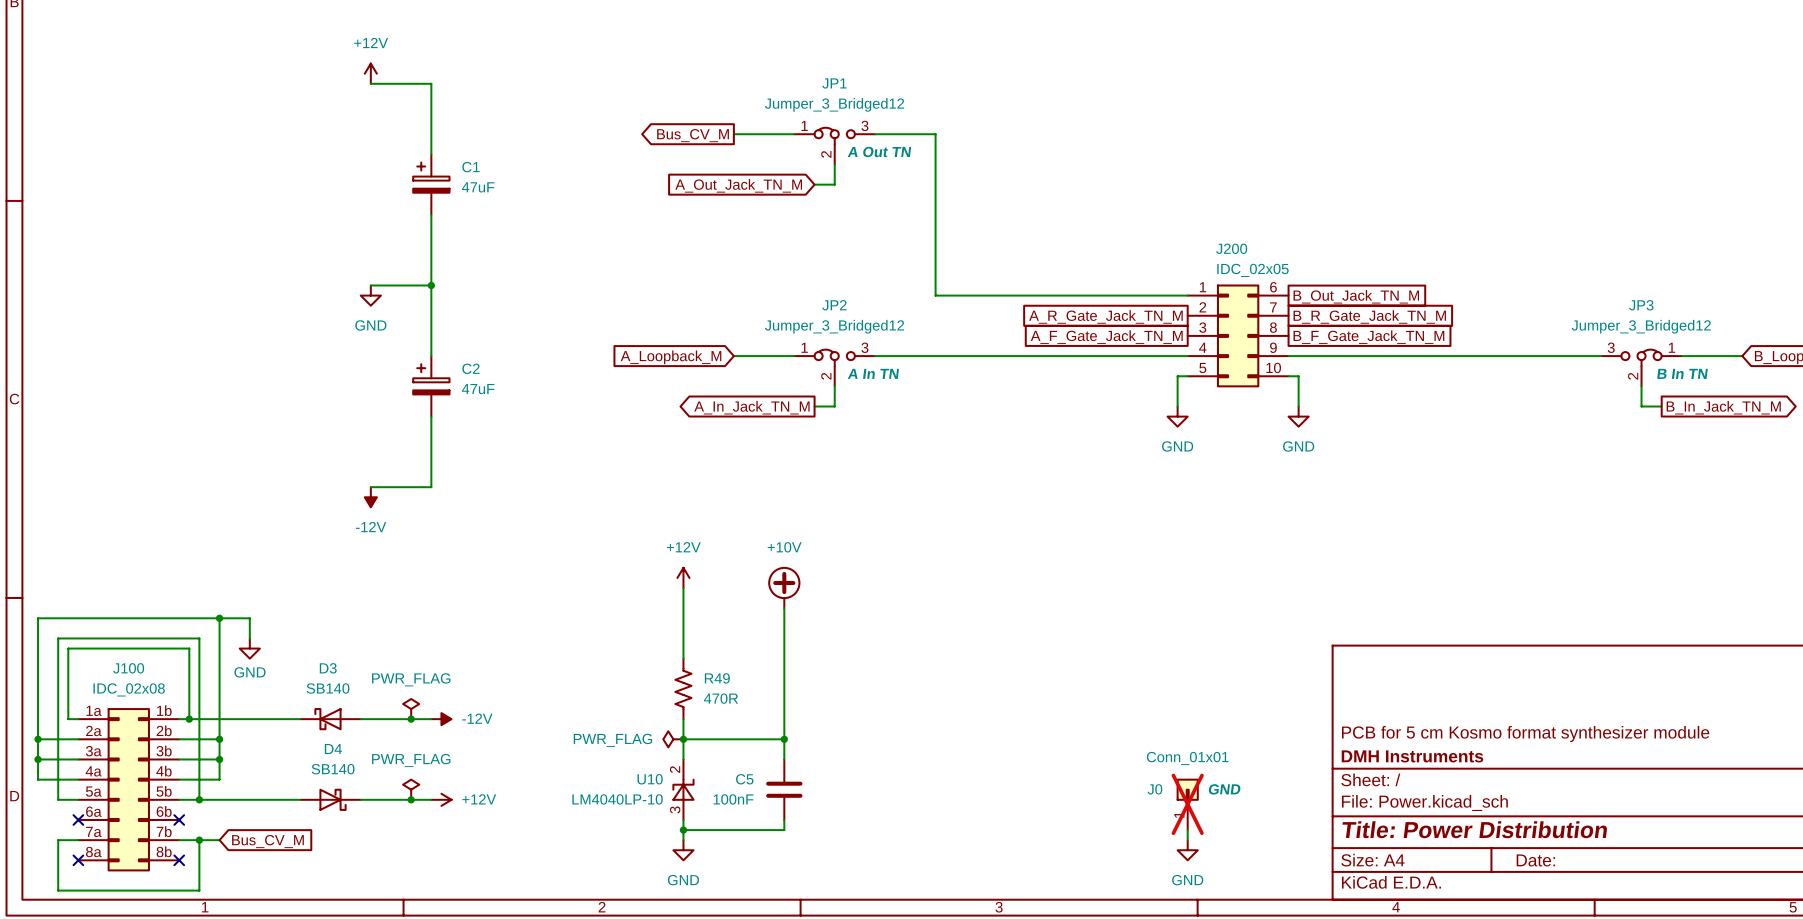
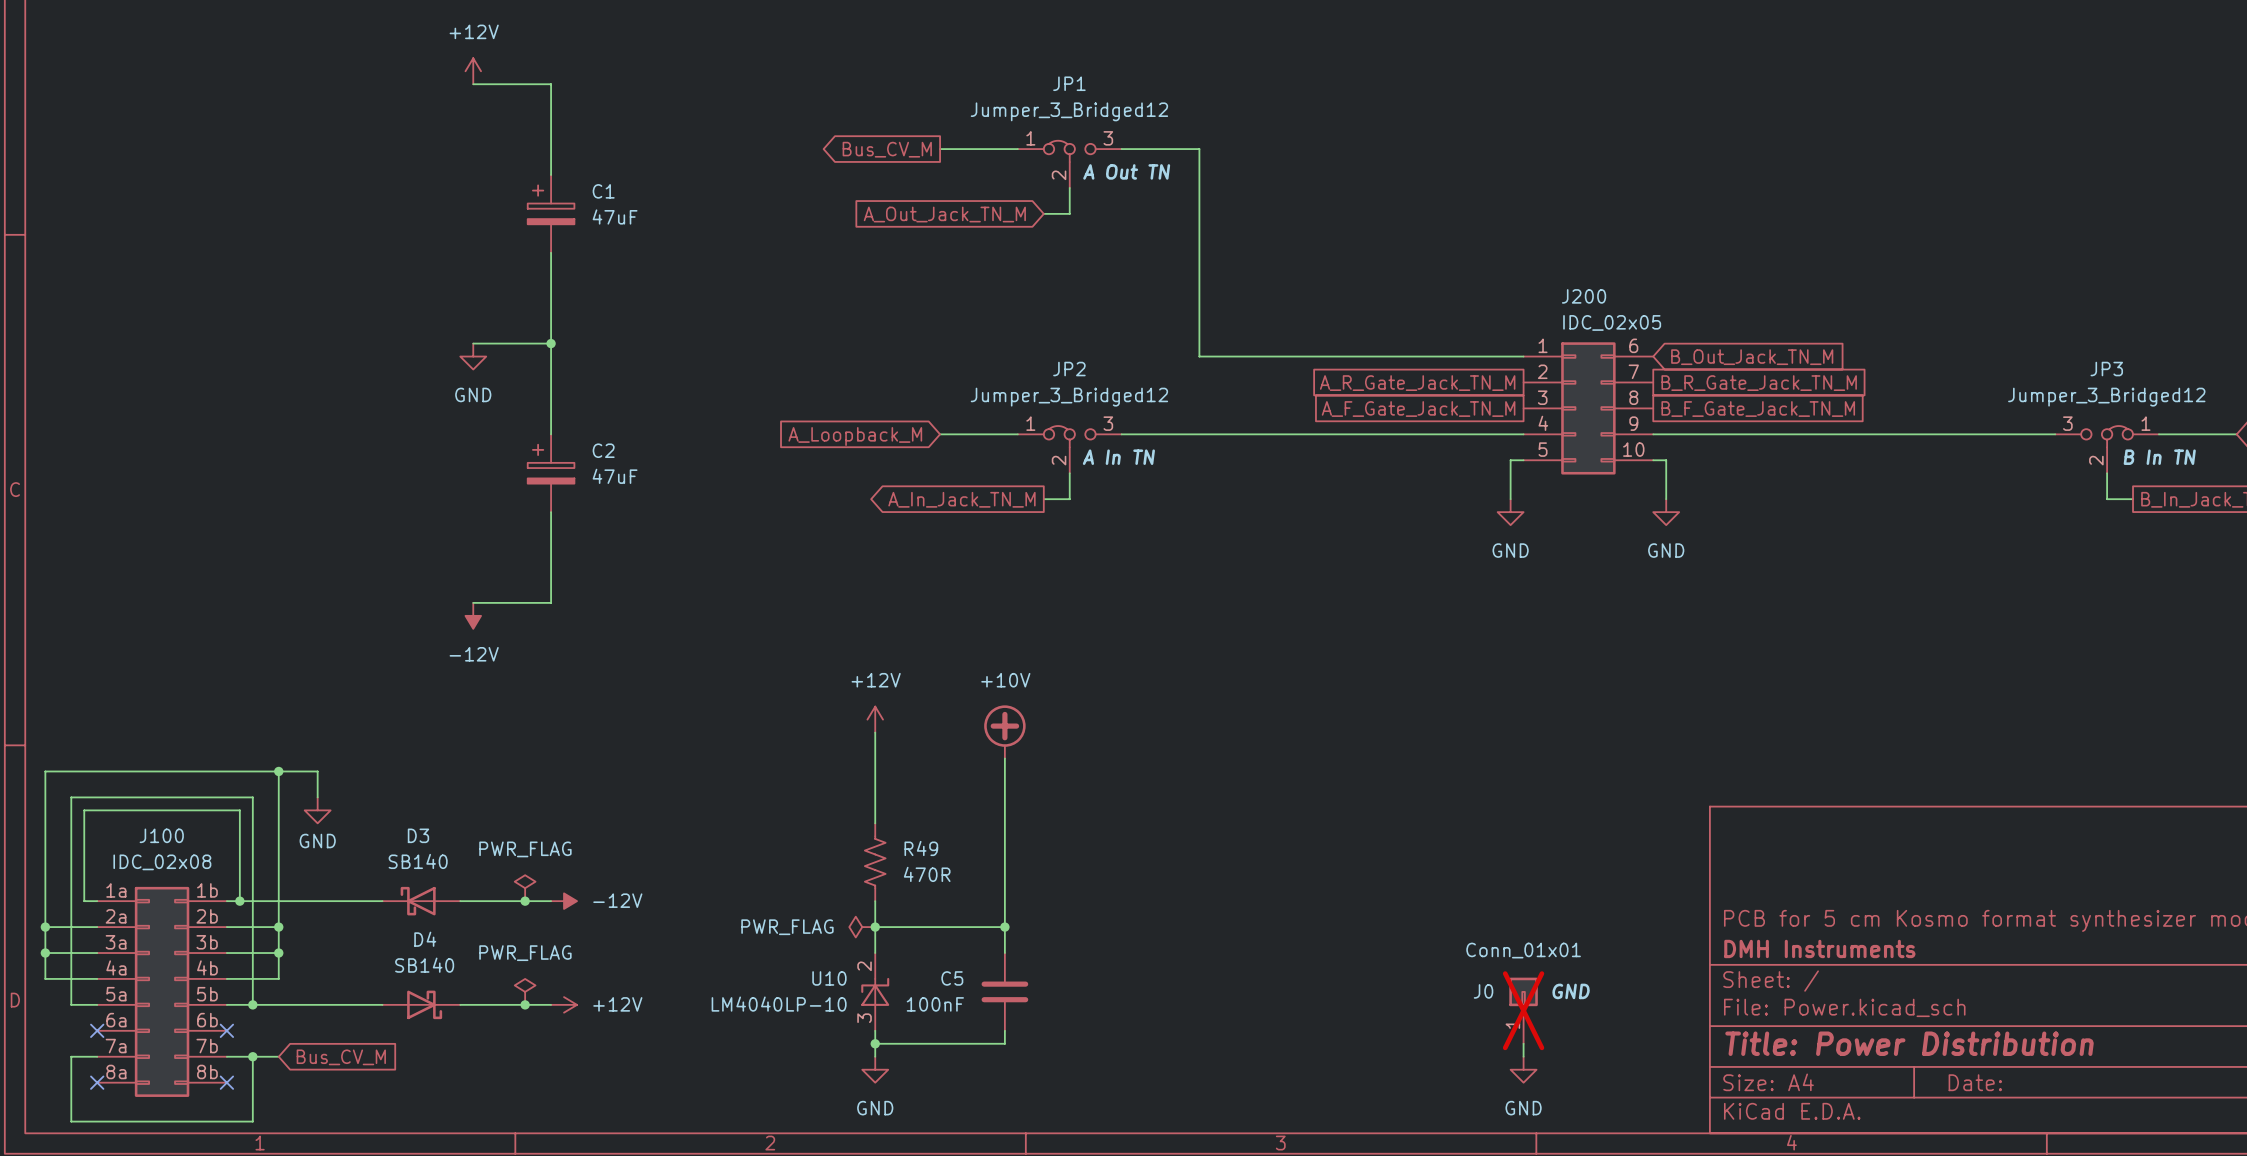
global label shape: passive (1356, 296) -> input (1752, 357)

